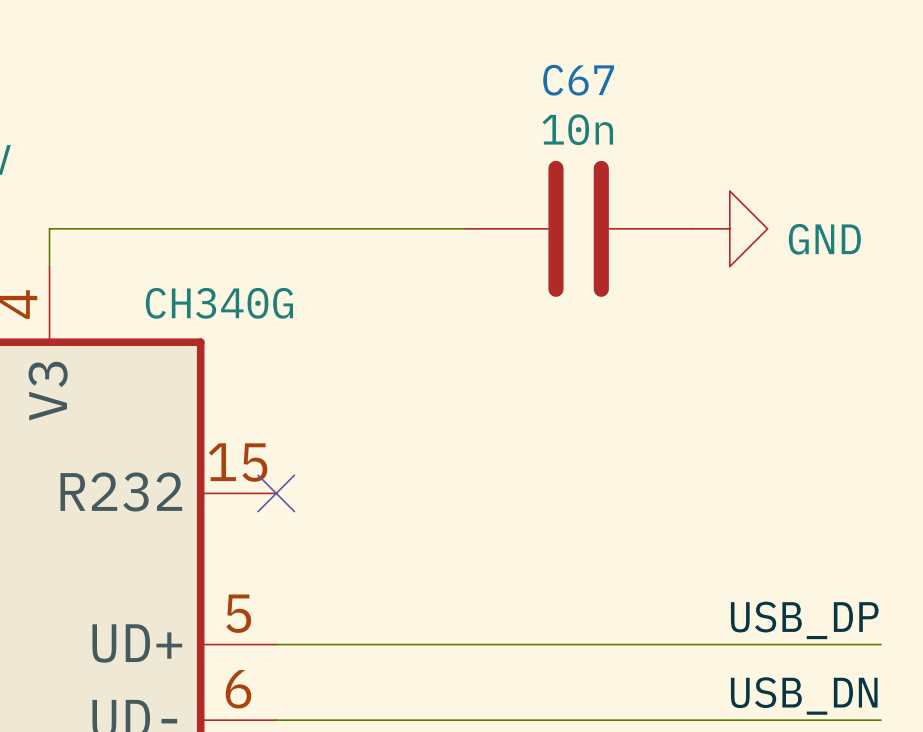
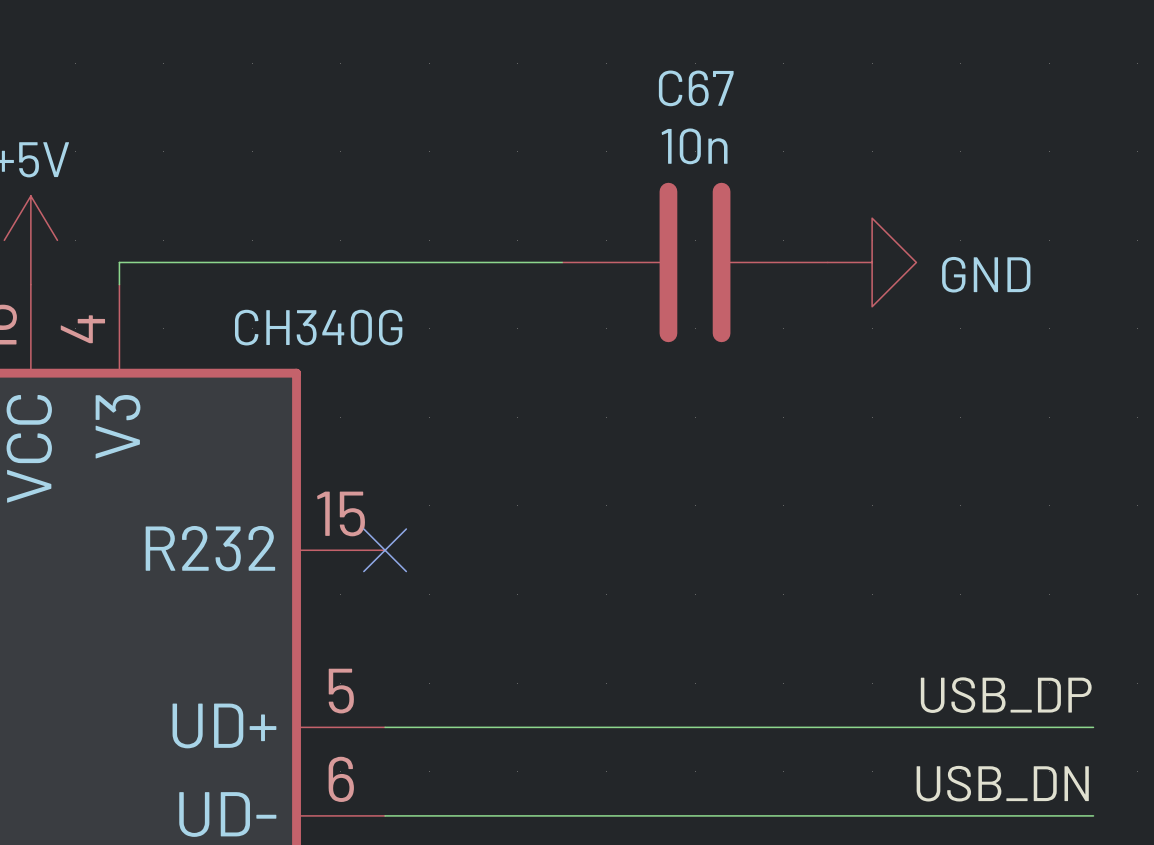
wire: (465, 228) (49, 228) (49, 247) -> (562, 262) (119, 262)
C67 position: (578, 228) -> (695, 262)
power symbol position: GND (729, 228) -> GND (872, 262)

